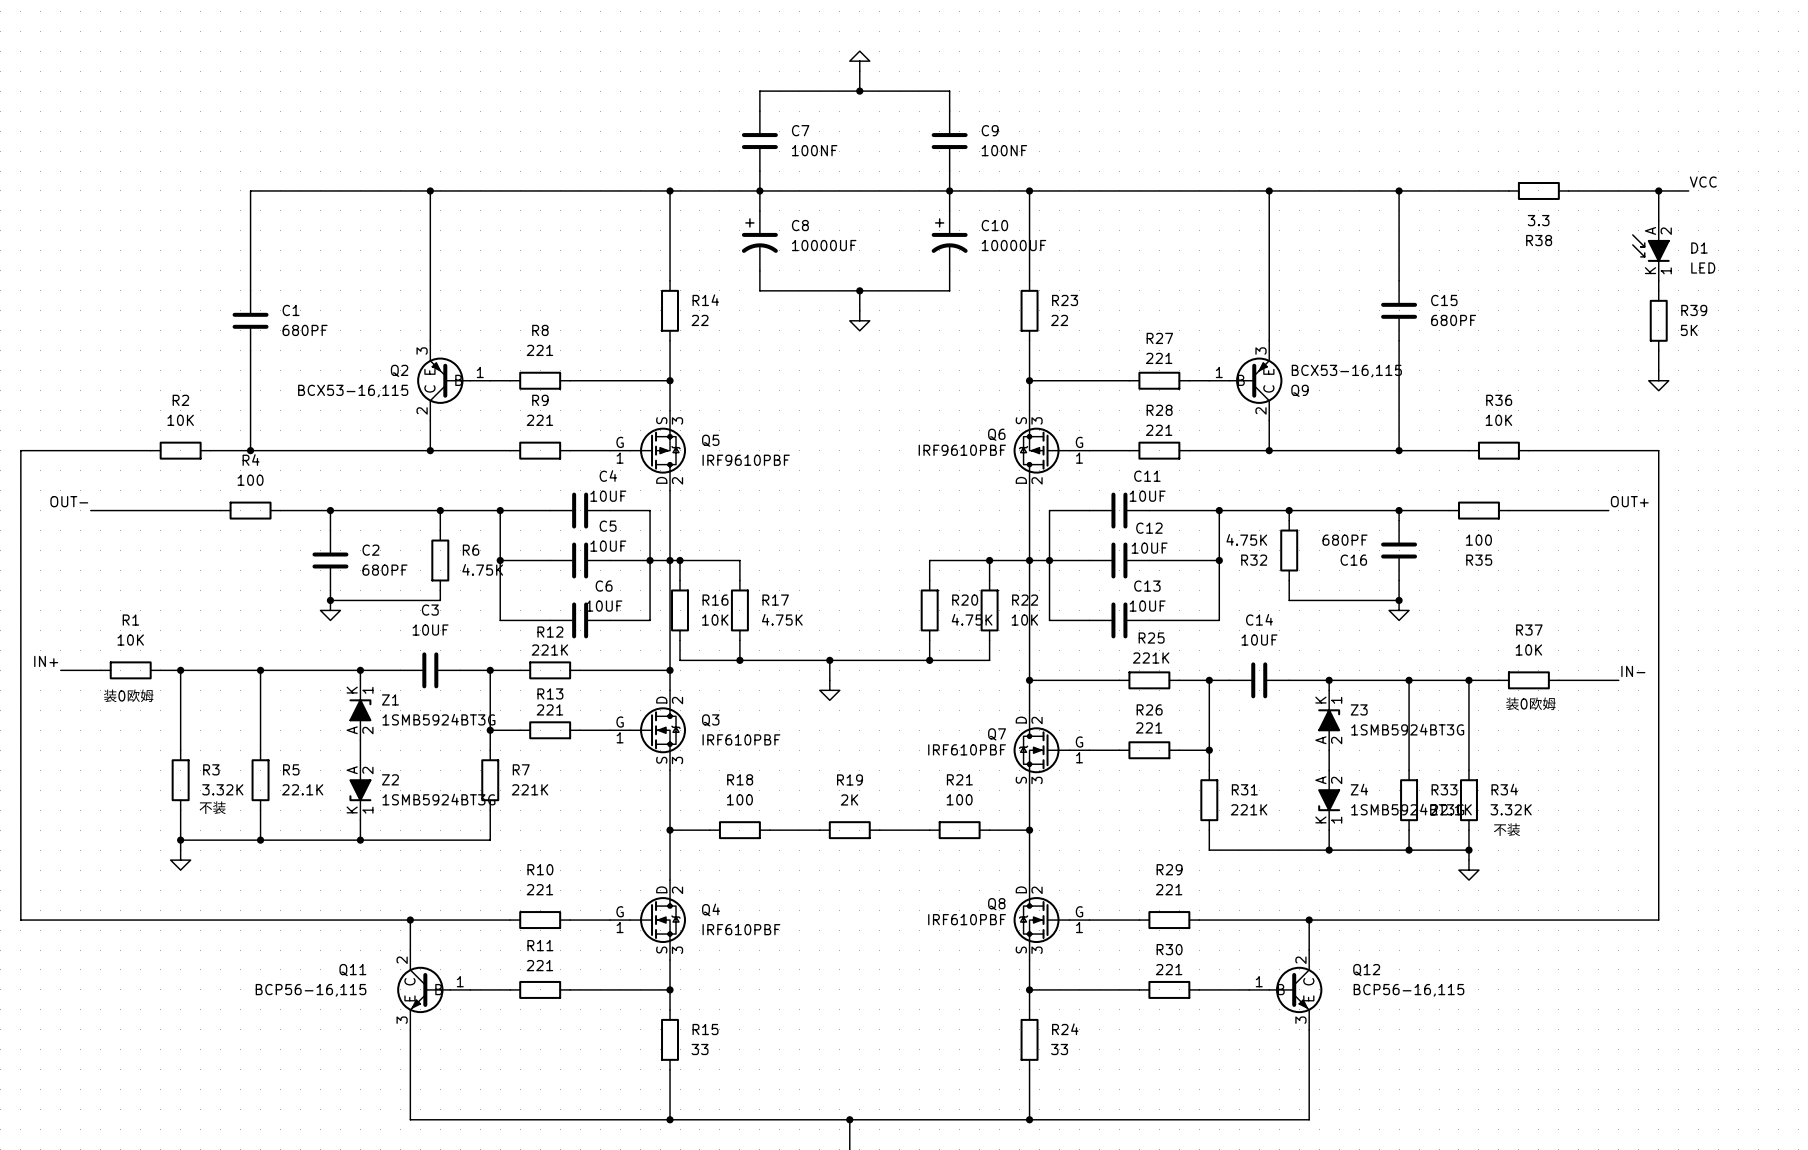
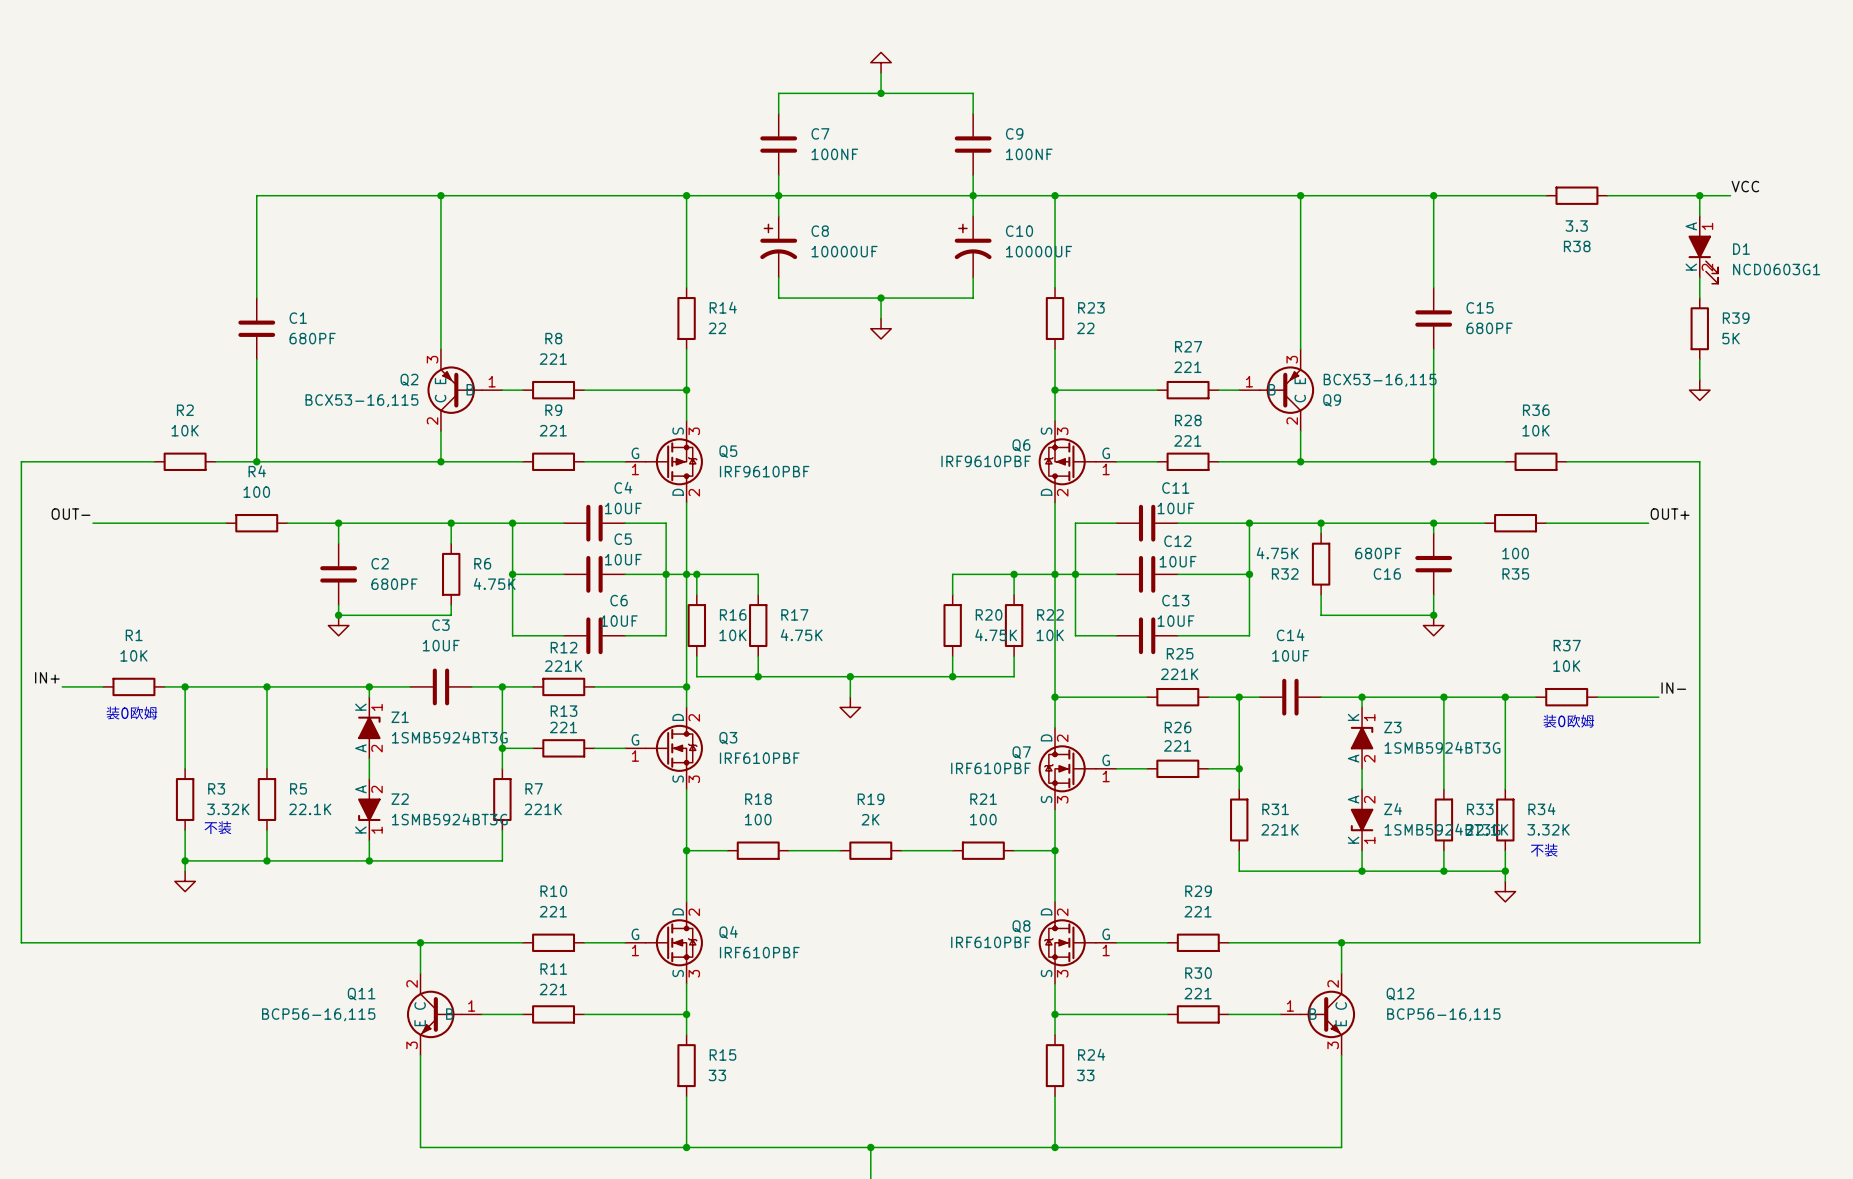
D1 symbol: [1632, 220, 1670, 281] -> [1688, 216, 1719, 284]
D1 value: LED (1703, 268) -> NCD0603G1 (1776, 269)

